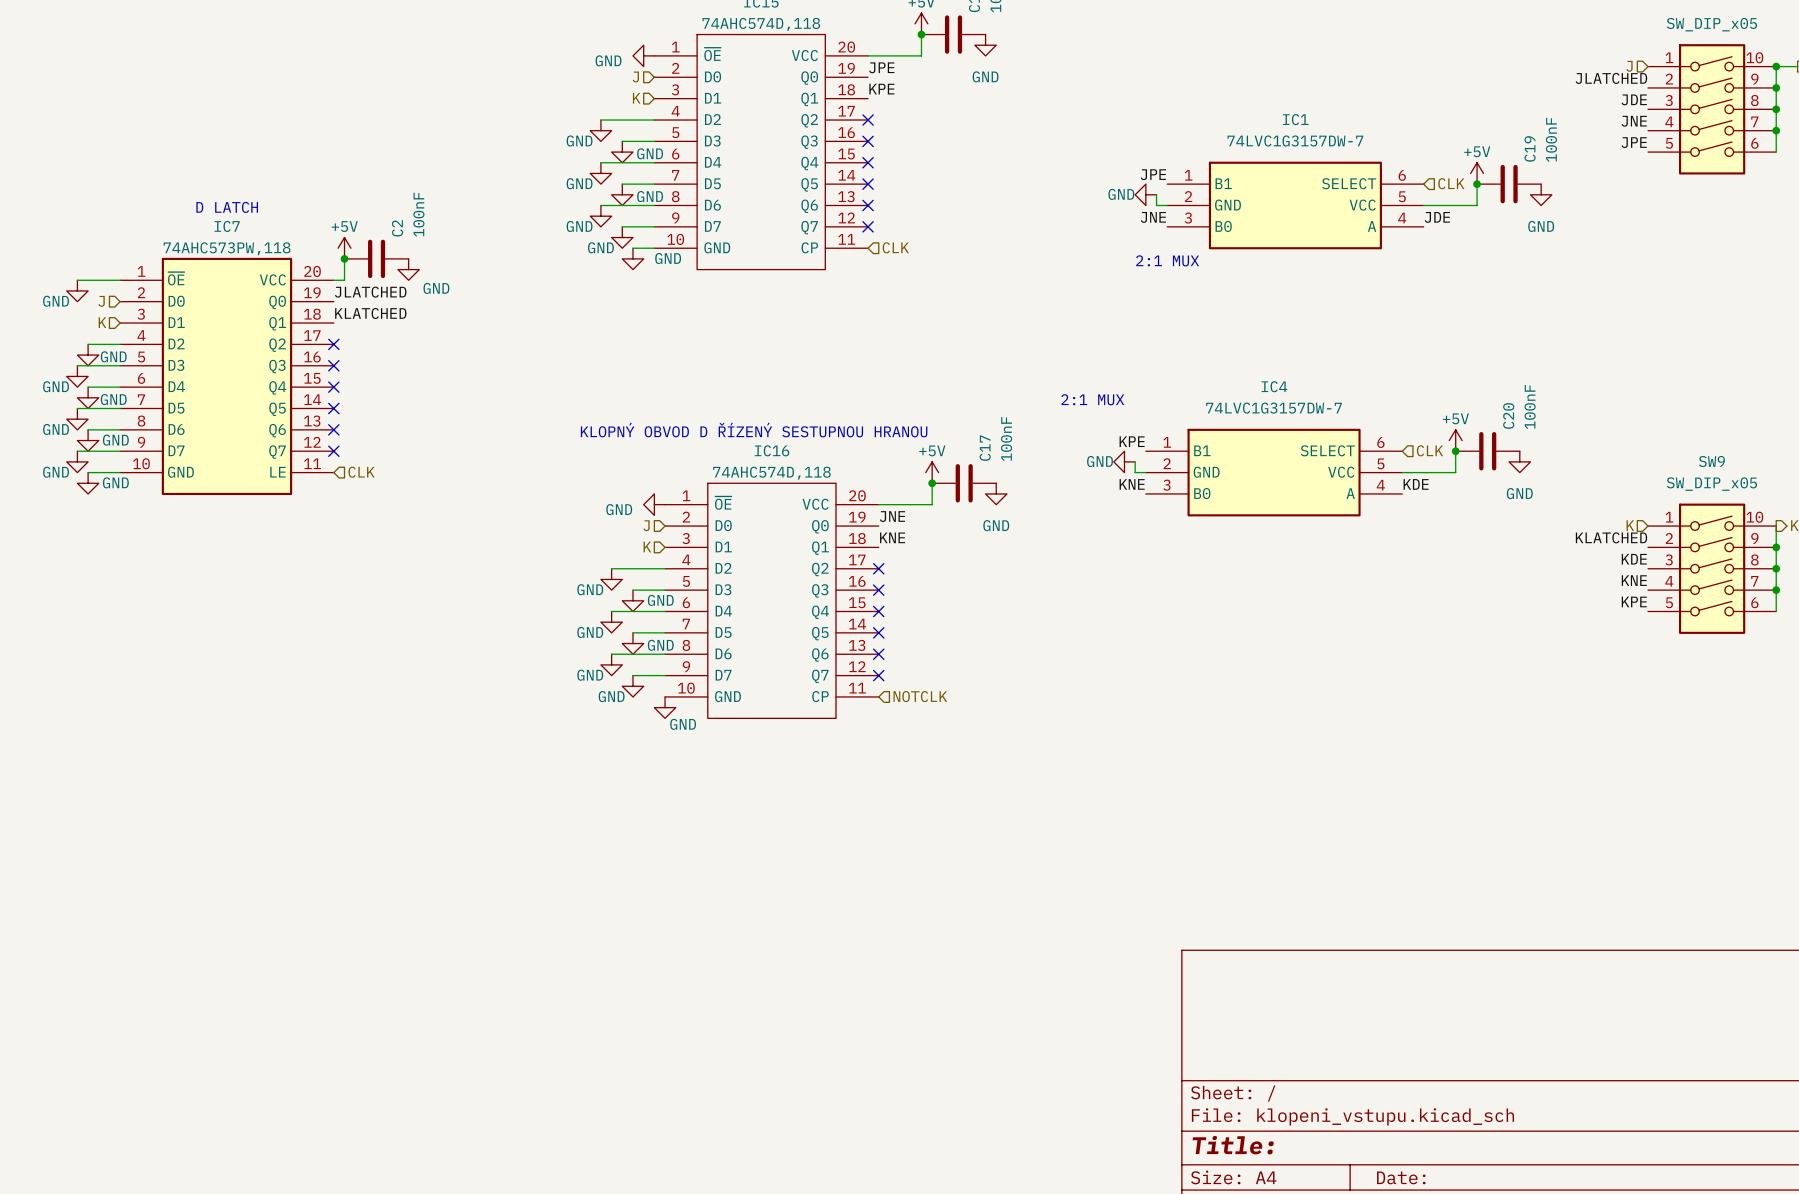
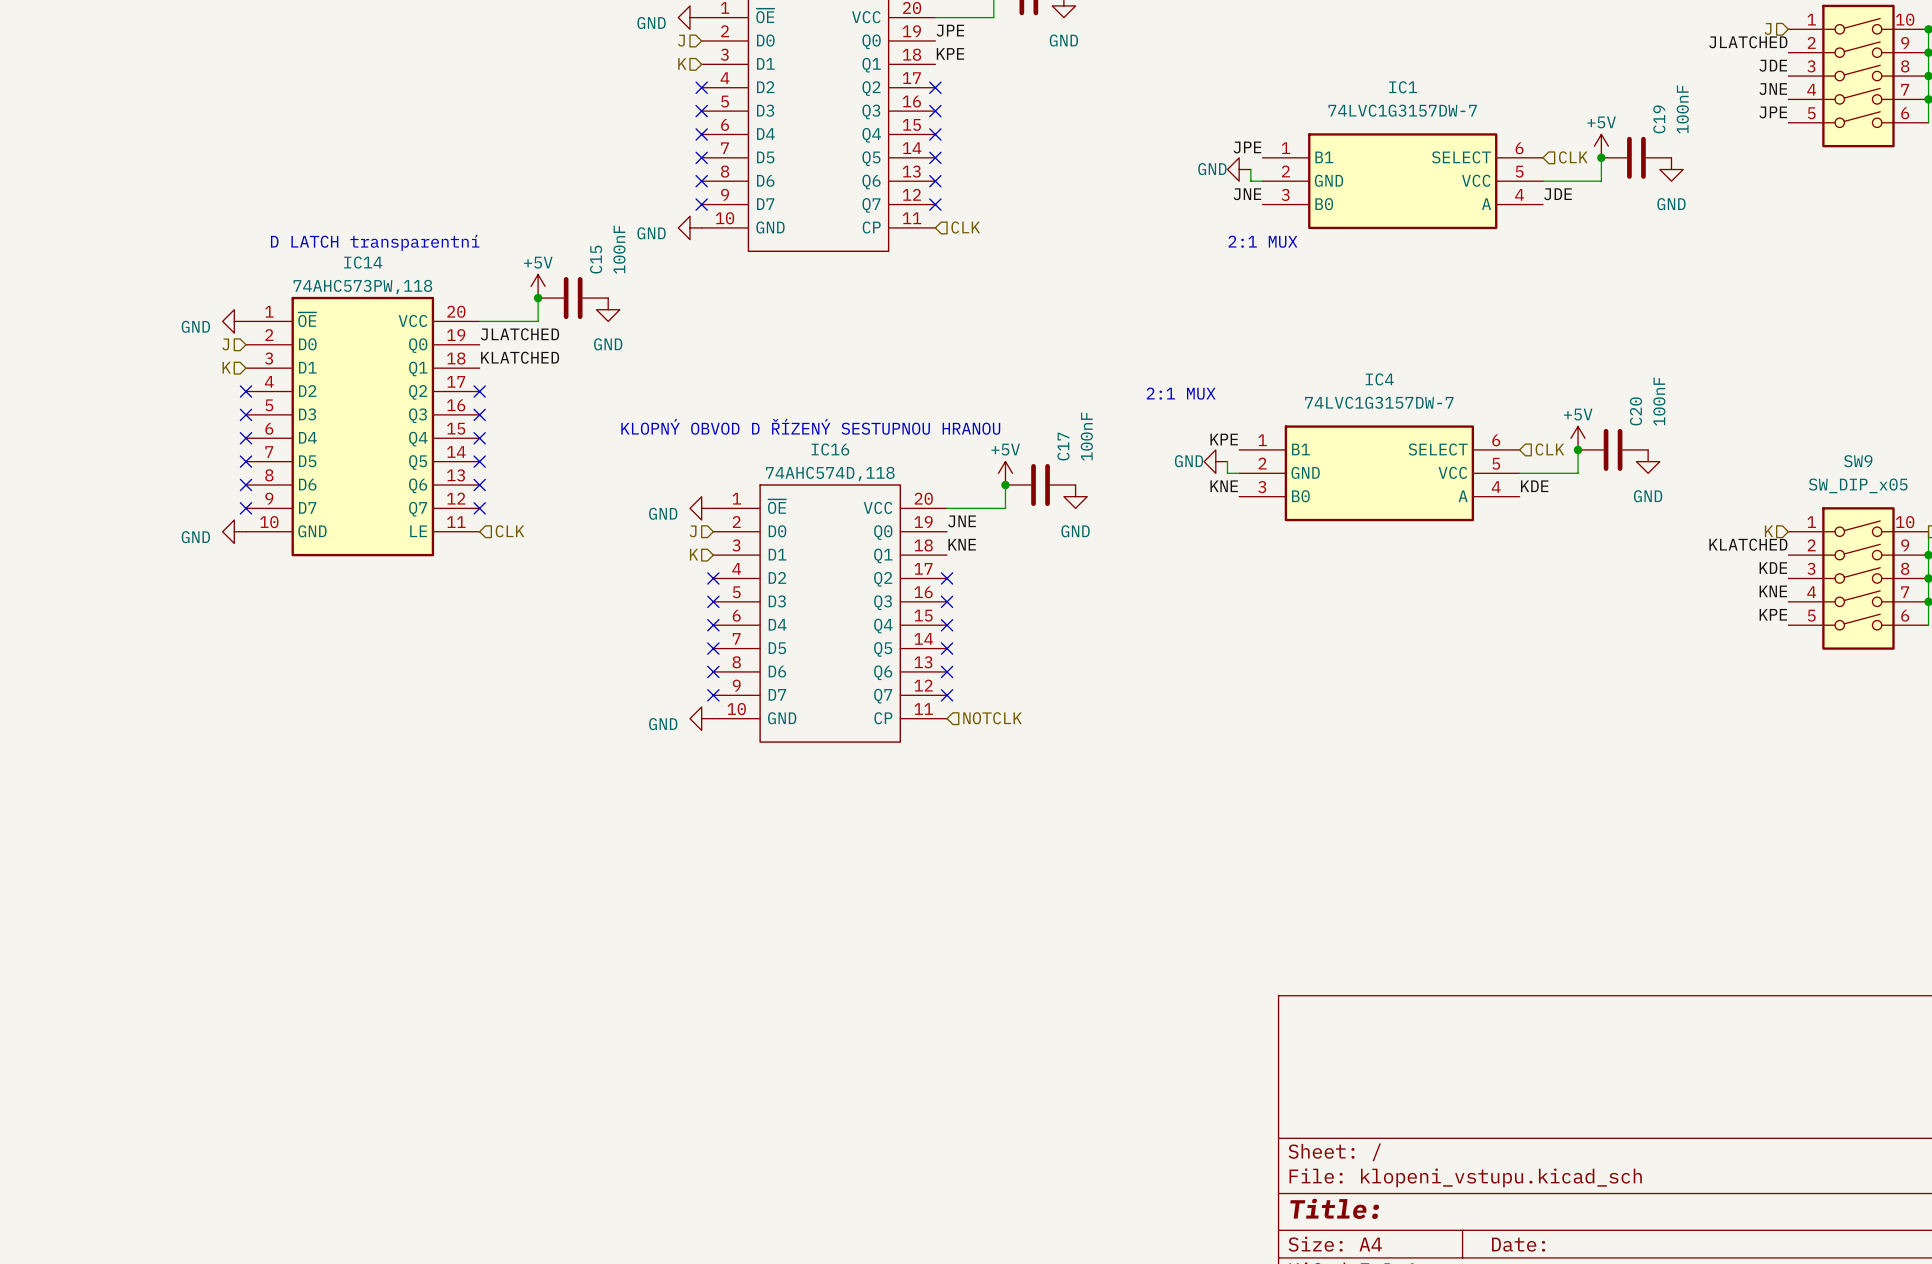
wire: (600, 120) (654, 120) -> none
no-connect mark: none -> (701, 87)
power symbol: GND (600, 130) -> none
wire: (622, 141) (654, 141) -> none
no-connect mark: none -> (701, 111)
power symbol: GND (622, 152) -> none
wire: (600, 162) (654, 162) -> none
no-connect mark: none -> (701, 134)
power symbol: GND (600, 173) -> none
wire: (622, 184) (654, 184) -> none
no-connect mark: none -> (701, 157)
power symbol: GND (622, 194) -> none
wire: (600, 205) (654, 205) -> none
no-connect mark: none -> (701, 181)
text: D LATCH (227, 207) -> none
power symbol: GND (600, 216) -> none
wire: (622, 226) (654, 226) -> none
no-connect mark: none -> (701, 204)
power symbol: GND (622, 237) -> none
power symbol position: +5V (344, 248) -> +5V (538, 286)
power symbol: none -> GND (689, 227)
wire: (344, 258) (344, 280) (333, 280) -> none
junction: (344, 258) -> none
C2: 100nF (376, 258) -> none
power symbol: GND (632, 258) -> none
text: none -> D LATCH transparentní (375, 242)
power symbol: GND (408, 269) -> none
wire: (77, 280) (120, 280) -> none
power symbol: GND (77, 290) -> none
label position: JLATCHED (370, 292) -> JLATCHED (520, 334)
hierarchical label position: J (101, 301) -> J (225, 344)
wire: none -> (538, 298) (538, 321) (479, 321)
junction: none -> (538, 298)
C15: none -> 100nF (573, 298)
label position: KLATCHED (370, 313) -> KLATCHED (520, 357)
hierarchical label position: K (102, 322) -> K (226, 367)
power symbol: none -> GND (608, 309)
power symbol: none -> GND (234, 321)
wire: (88, 344) (120, 344) -> none
no-connect mark: (333, 344) -> none
power symbol: GND (88, 355) -> none
wire: (77, 365) (120, 365) -> none
no-connect mark: (333, 365) -> none
power symbol: GND (77, 376) -> none
IC7: 74AHC573PW,118 (226, 376) -> none
wire: (88, 387) (120, 387) -> none
no-connect mark: (333, 387) -> none
power symbol: GND (88, 397) -> none
no-connect mark: none -> (245, 391)
no-connect mark: none -> (479, 391)
wire: (77, 408) (120, 408) -> none
no-connect mark: (333, 408) -> none
power symbol: GND (77, 419) -> none
no-connect mark: none -> (245, 414)
no-connect mark: none -> (479, 414)
wire: (88, 429) (120, 429) -> none
no-connect mark: (333, 429) -> none
IC14: none -> 74AHC573PW,118 (362, 426)
power symbol: GND (88, 440) -> none
no-connect mark: none -> (245, 438)
no-connect mark: none -> (479, 438)
wire: (77, 451) (120, 451) -> none
no-connect mark: (333, 451) -> none
power symbol: GND (77, 461) -> none
no-connect mark: none -> (245, 461)
no-connect mark: none -> (479, 461)
wire: (88, 472) (120, 472) -> none
hierarchical label position: CLK (361, 472) -> CLK (509, 531)
power symbol: GND (88, 483) -> none
no-connect mark: none -> (245, 484)
no-connect mark: none -> (479, 484)
no-connect mark: none -> (245, 508)
no-connect mark: none -> (479, 508)
power symbol: none -> GND (234, 531)
wire: (611, 568) (665, 568) -> none
no-connect mark: none -> (713, 578)
power symbol: GND (611, 579) -> none
wire: (632, 590) (665, 590) -> none
no-connect mark: none -> (713, 601)
power symbol: GND (632, 600) -> none
wire: (611, 611) (665, 611) -> none
no-connect mark: none -> (713, 625)
power symbol: GND (611, 622) -> none
wire: (632, 632) (665, 632) -> none
no-connect mark: none -> (713, 648)
power symbol: GND (632, 643) -> none
wire: (611, 654) (665, 654) -> none
no-connect mark: none -> (713, 671)
power symbol: GND (611, 664) -> none
wire: (632, 675) (665, 675) -> none
no-connect mark: none -> (713, 695)
power symbol: GND (632, 686) -> none
power symbol: none -> GND (701, 718)
power symbol: GND (665, 707) -> none

